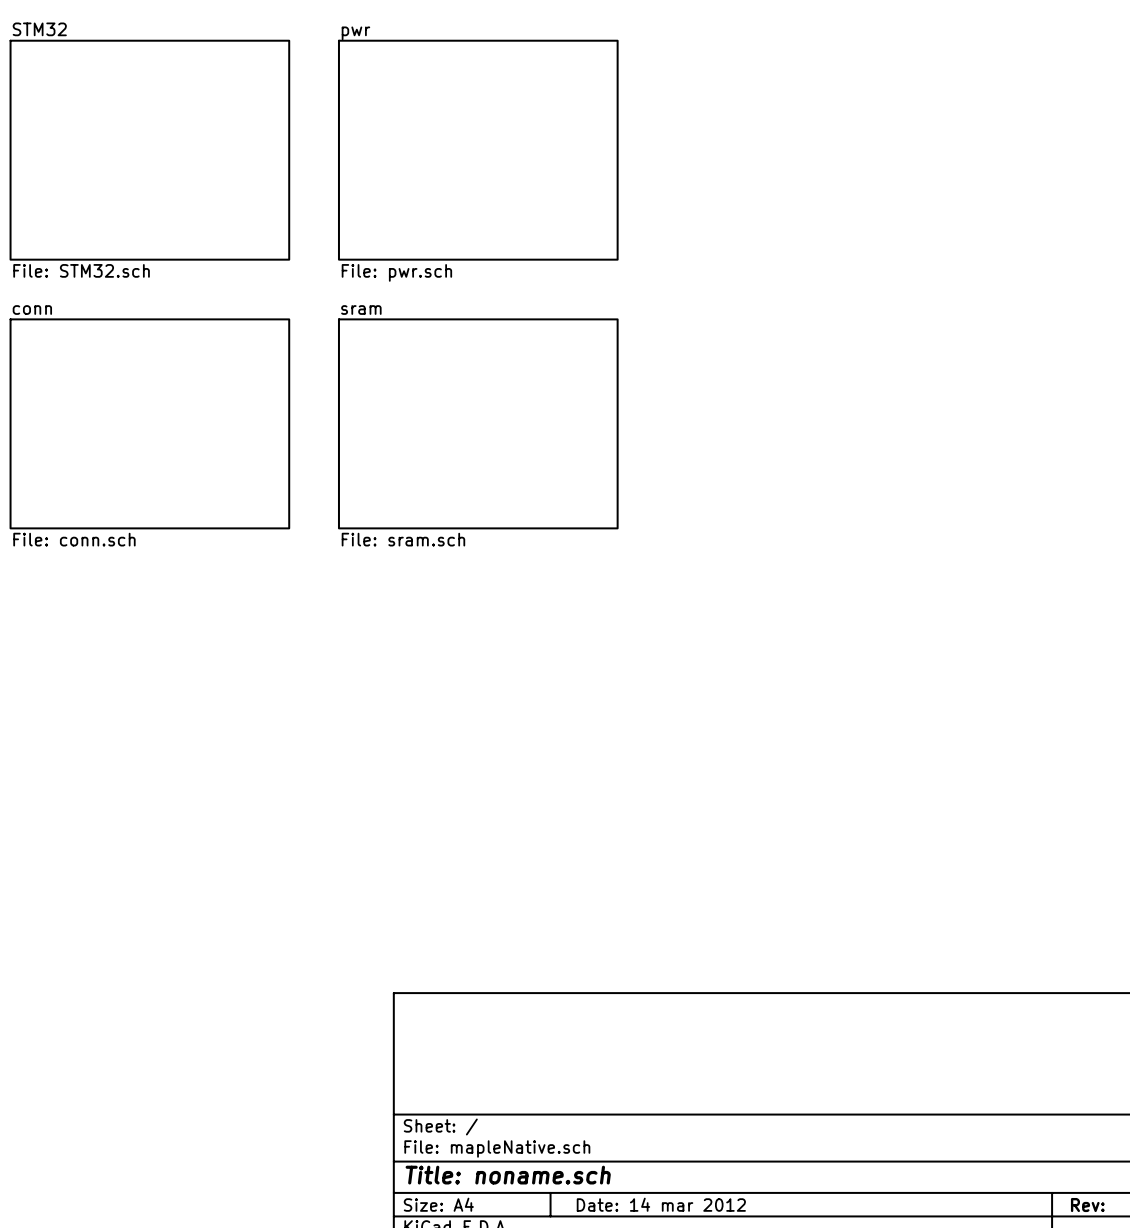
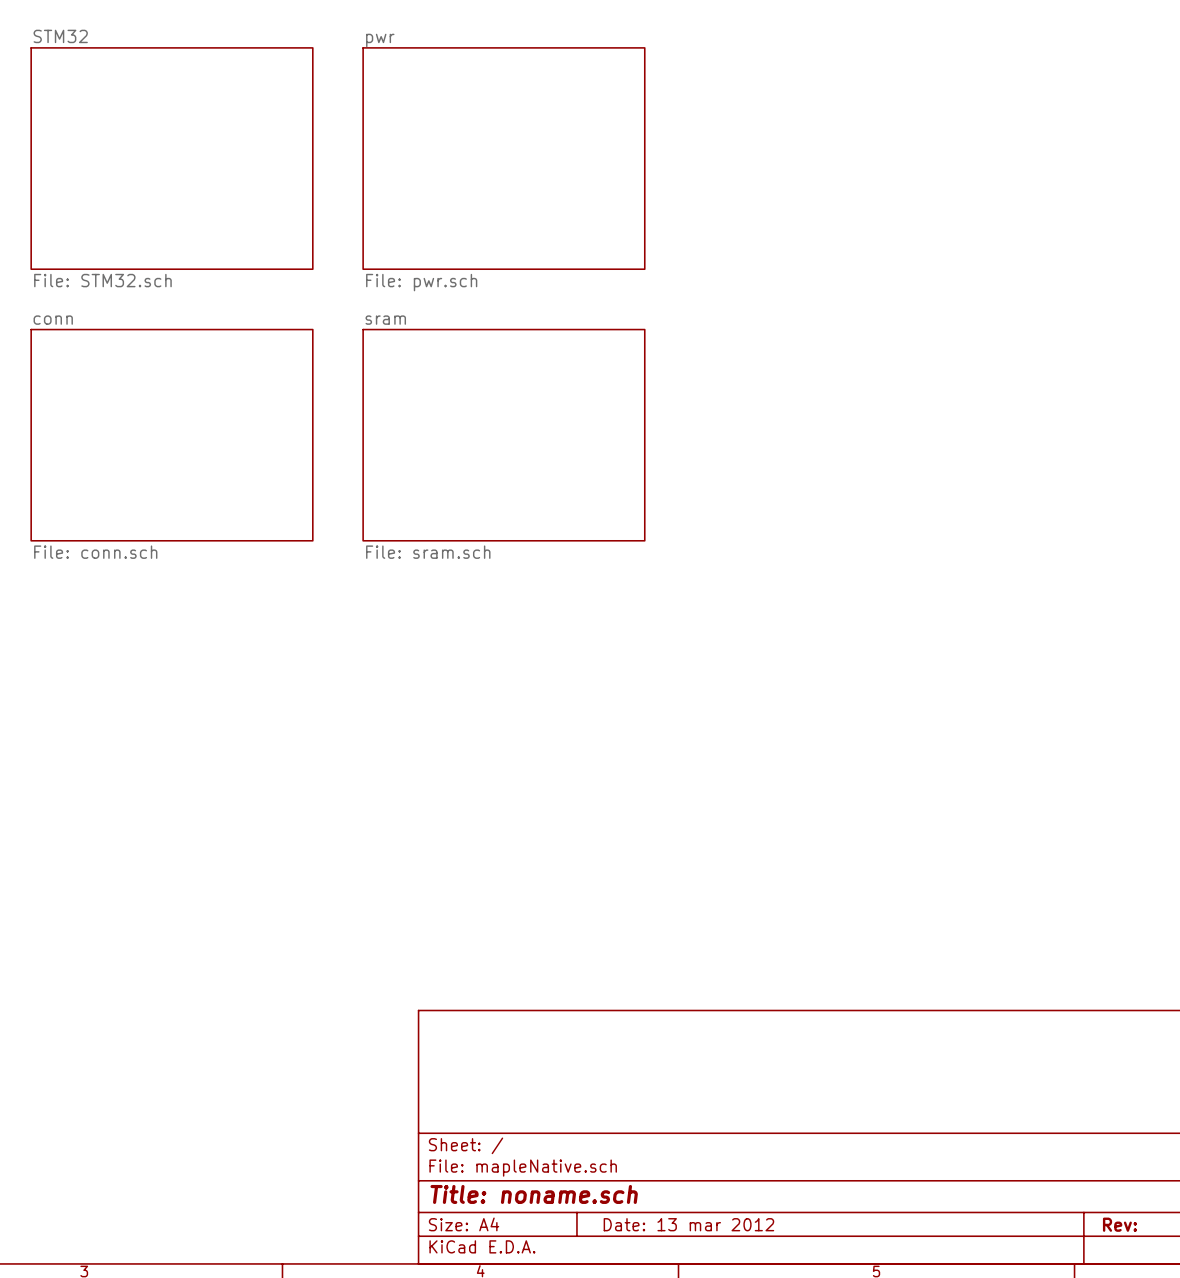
title block: Date: 14 mar 2012 (661, 1204) -> Date: 13 mar 2012 (688, 1224)

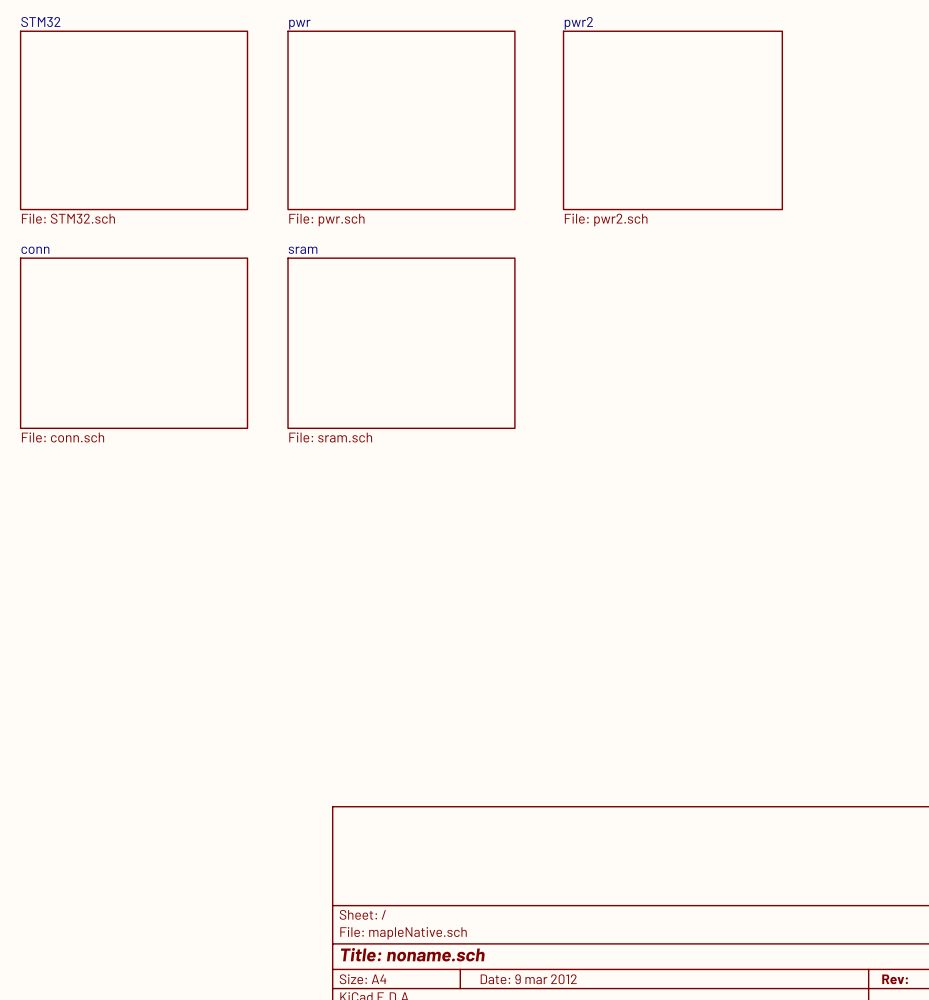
sheet pwr2: none -> File: pwr2.sch (672, 120)
title block: Date: 13 mar 2012 (688, 1224) -> Date: 9 mar 2012 (528, 979)

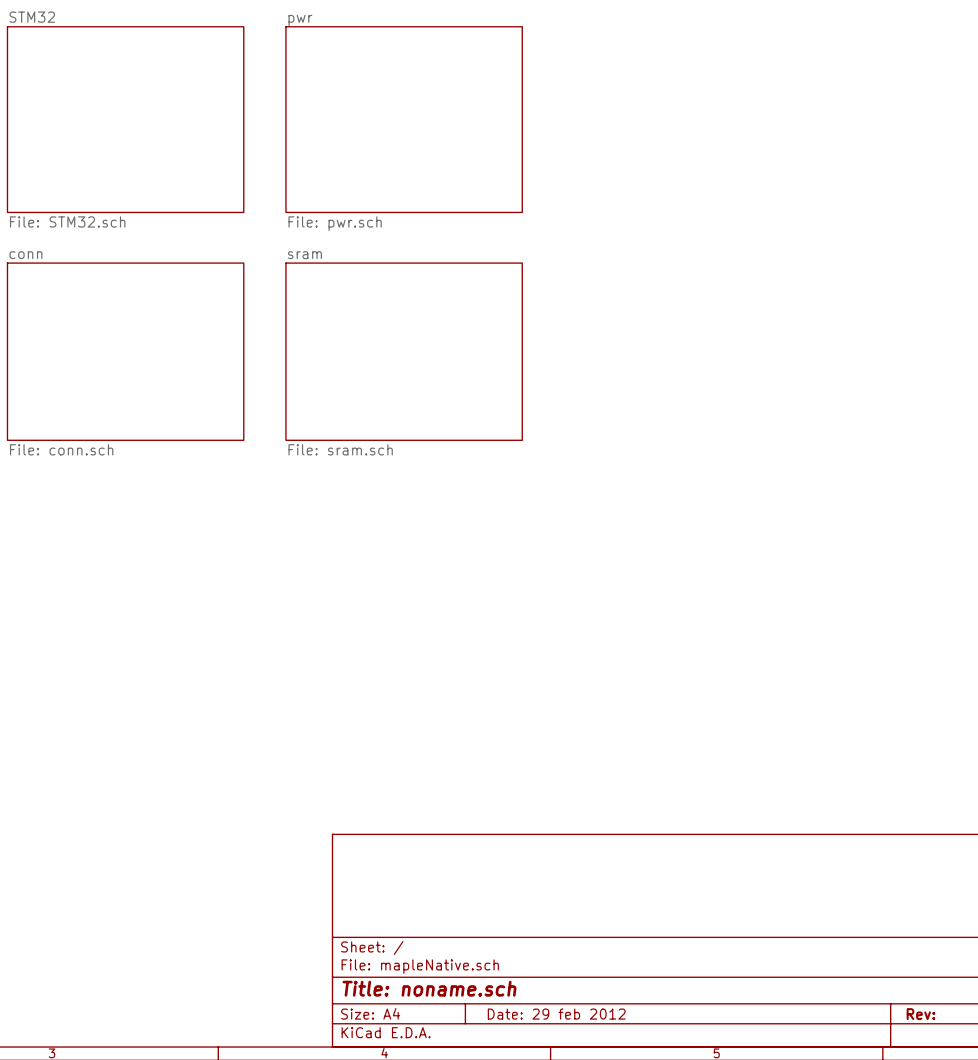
sheet pwr2: File: pwr2.sch (672, 120) -> none
title block: Date: 9 mar 2012 (528, 979) -> Date: 29 feb 2012 (556, 1014)

